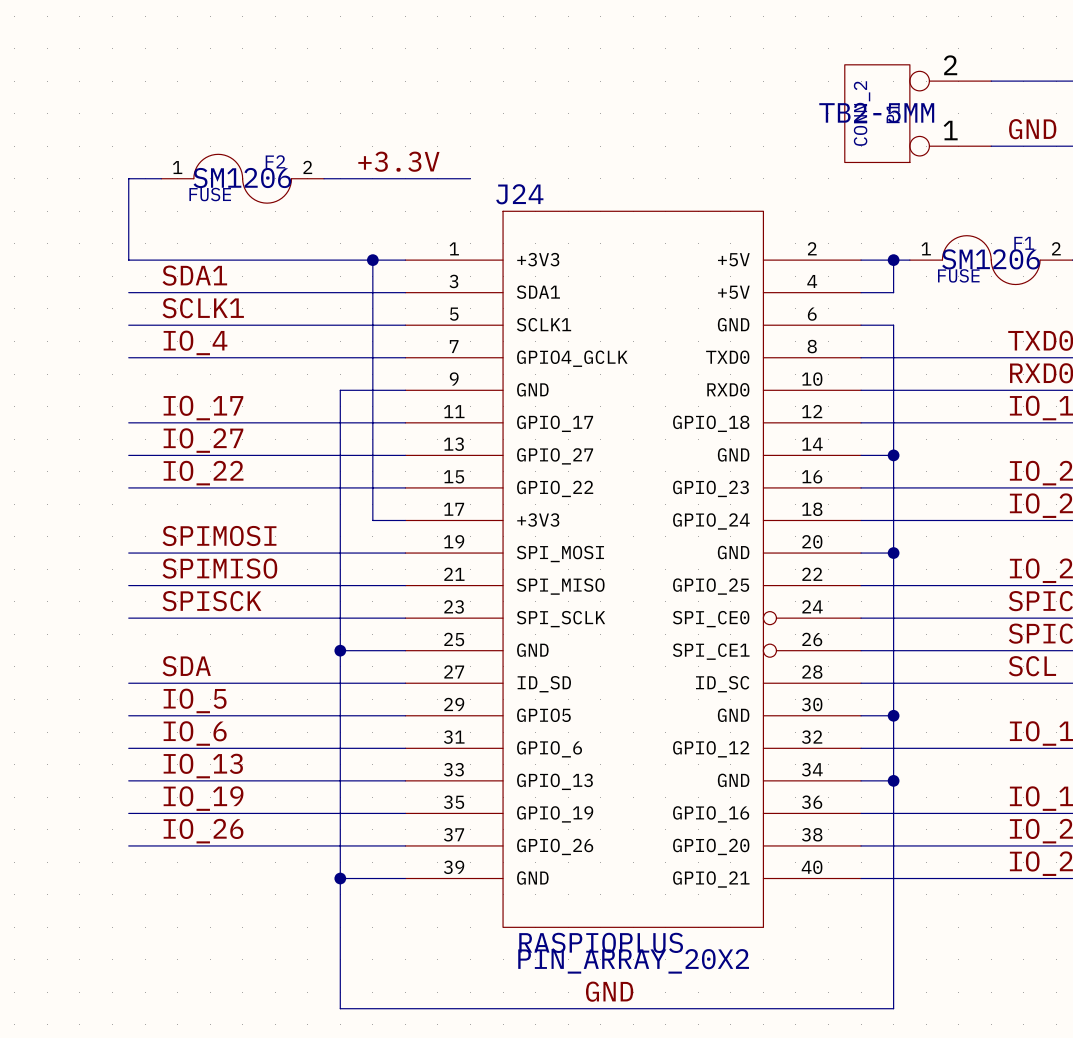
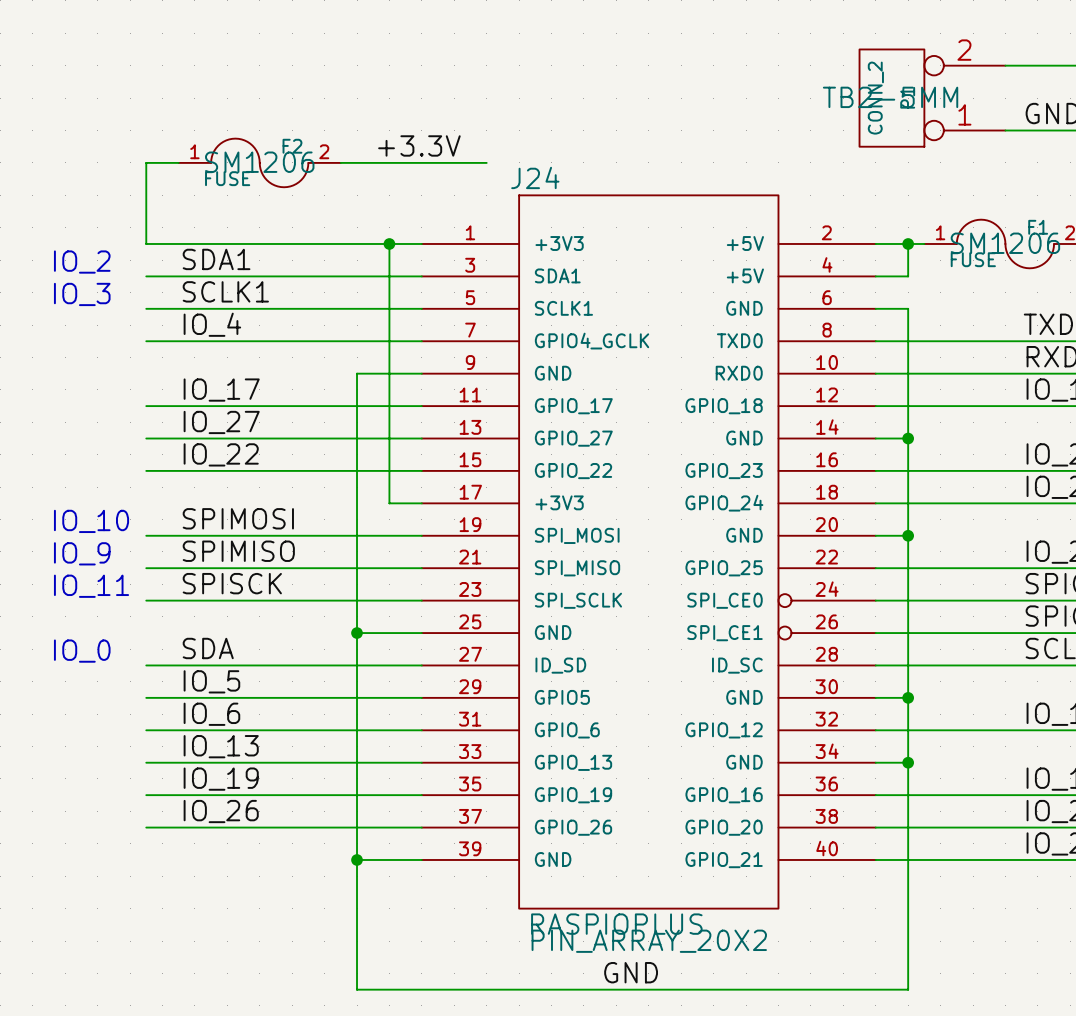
text: none -> IO_2 (82, 262)
text: none -> IO_3 (82, 294)
text: none -> IO_10 (91, 521)
text: none -> IO_9 (82, 553)
text: none -> IO_11 (91, 586)
text: none -> IO_0 (82, 651)

